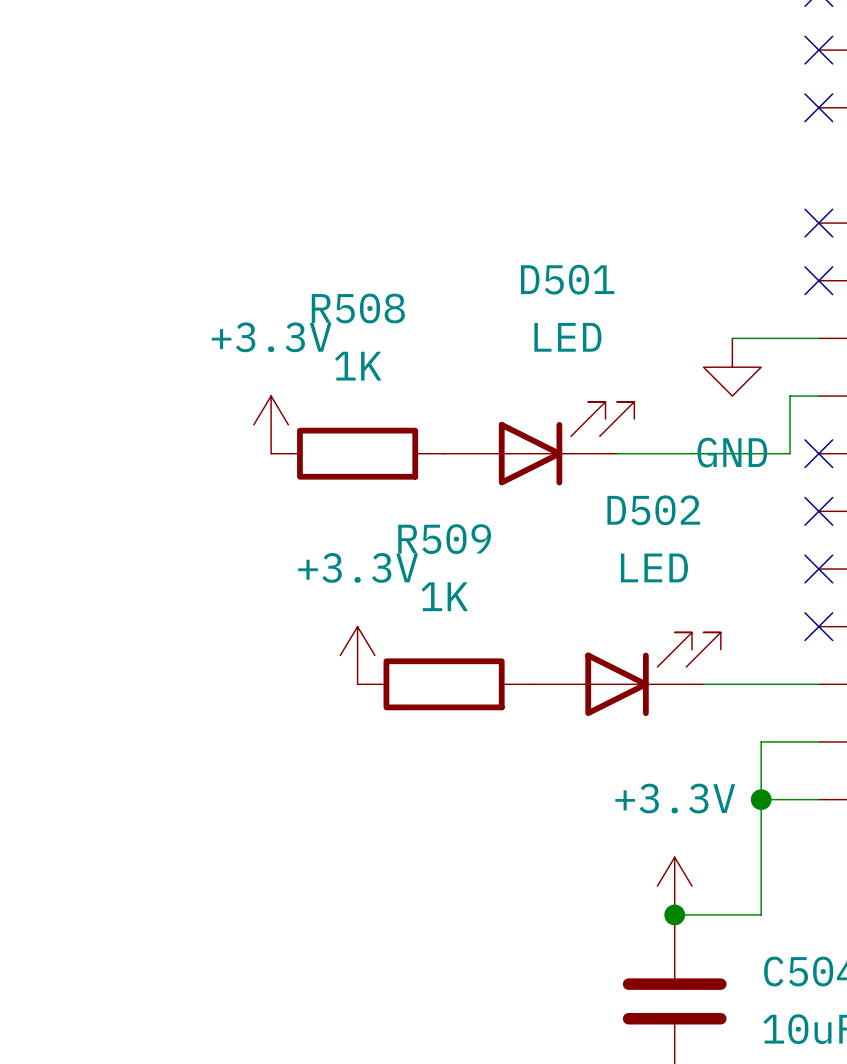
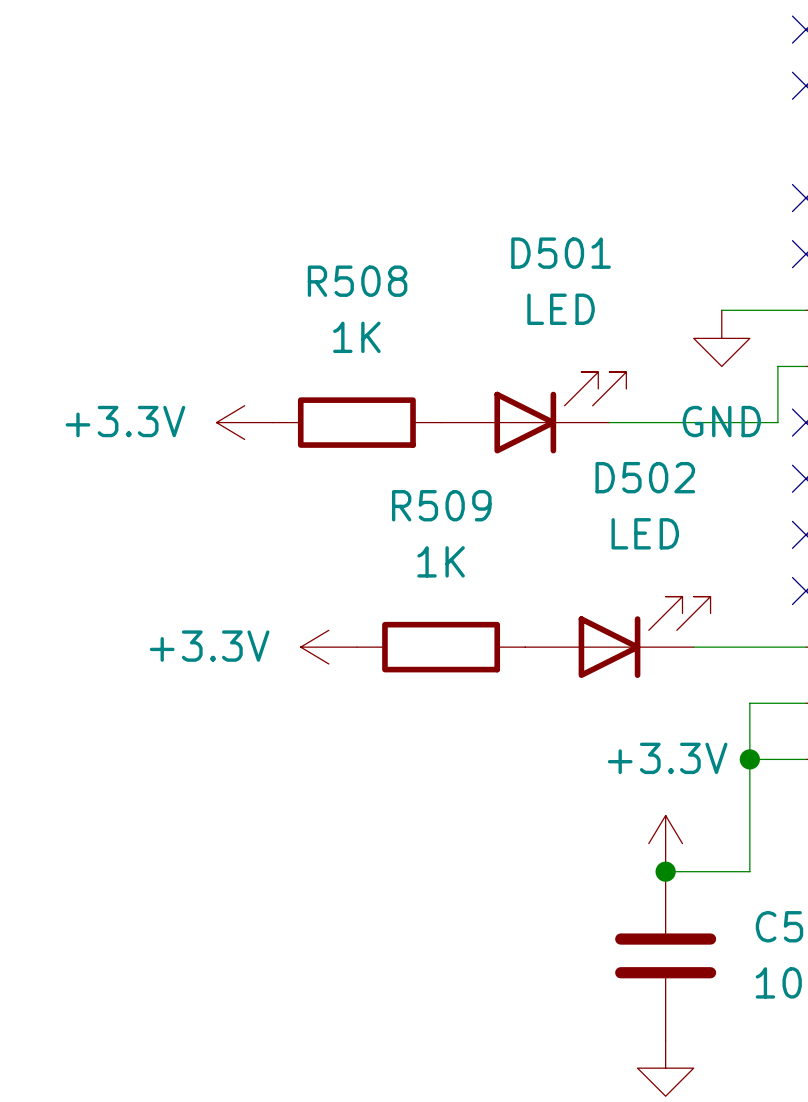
power symbol text position: +3.3V (271, 337) -> +3.3V (125, 421)
power symbol rotation: 0° (271, 424) -> 90° counterclockwise (244, 422)
power symbol position: +3.3V (271, 424) -> +3.3V (244, 422)
power symbol text position: +3.3V (358, 567) -> +3.3V (209, 646)
power symbol rotation: 0° (357, 655) -> 90° counterclockwise (328, 647)
power symbol position: +3.3V (357, 655) -> +3.3V (328, 647)

